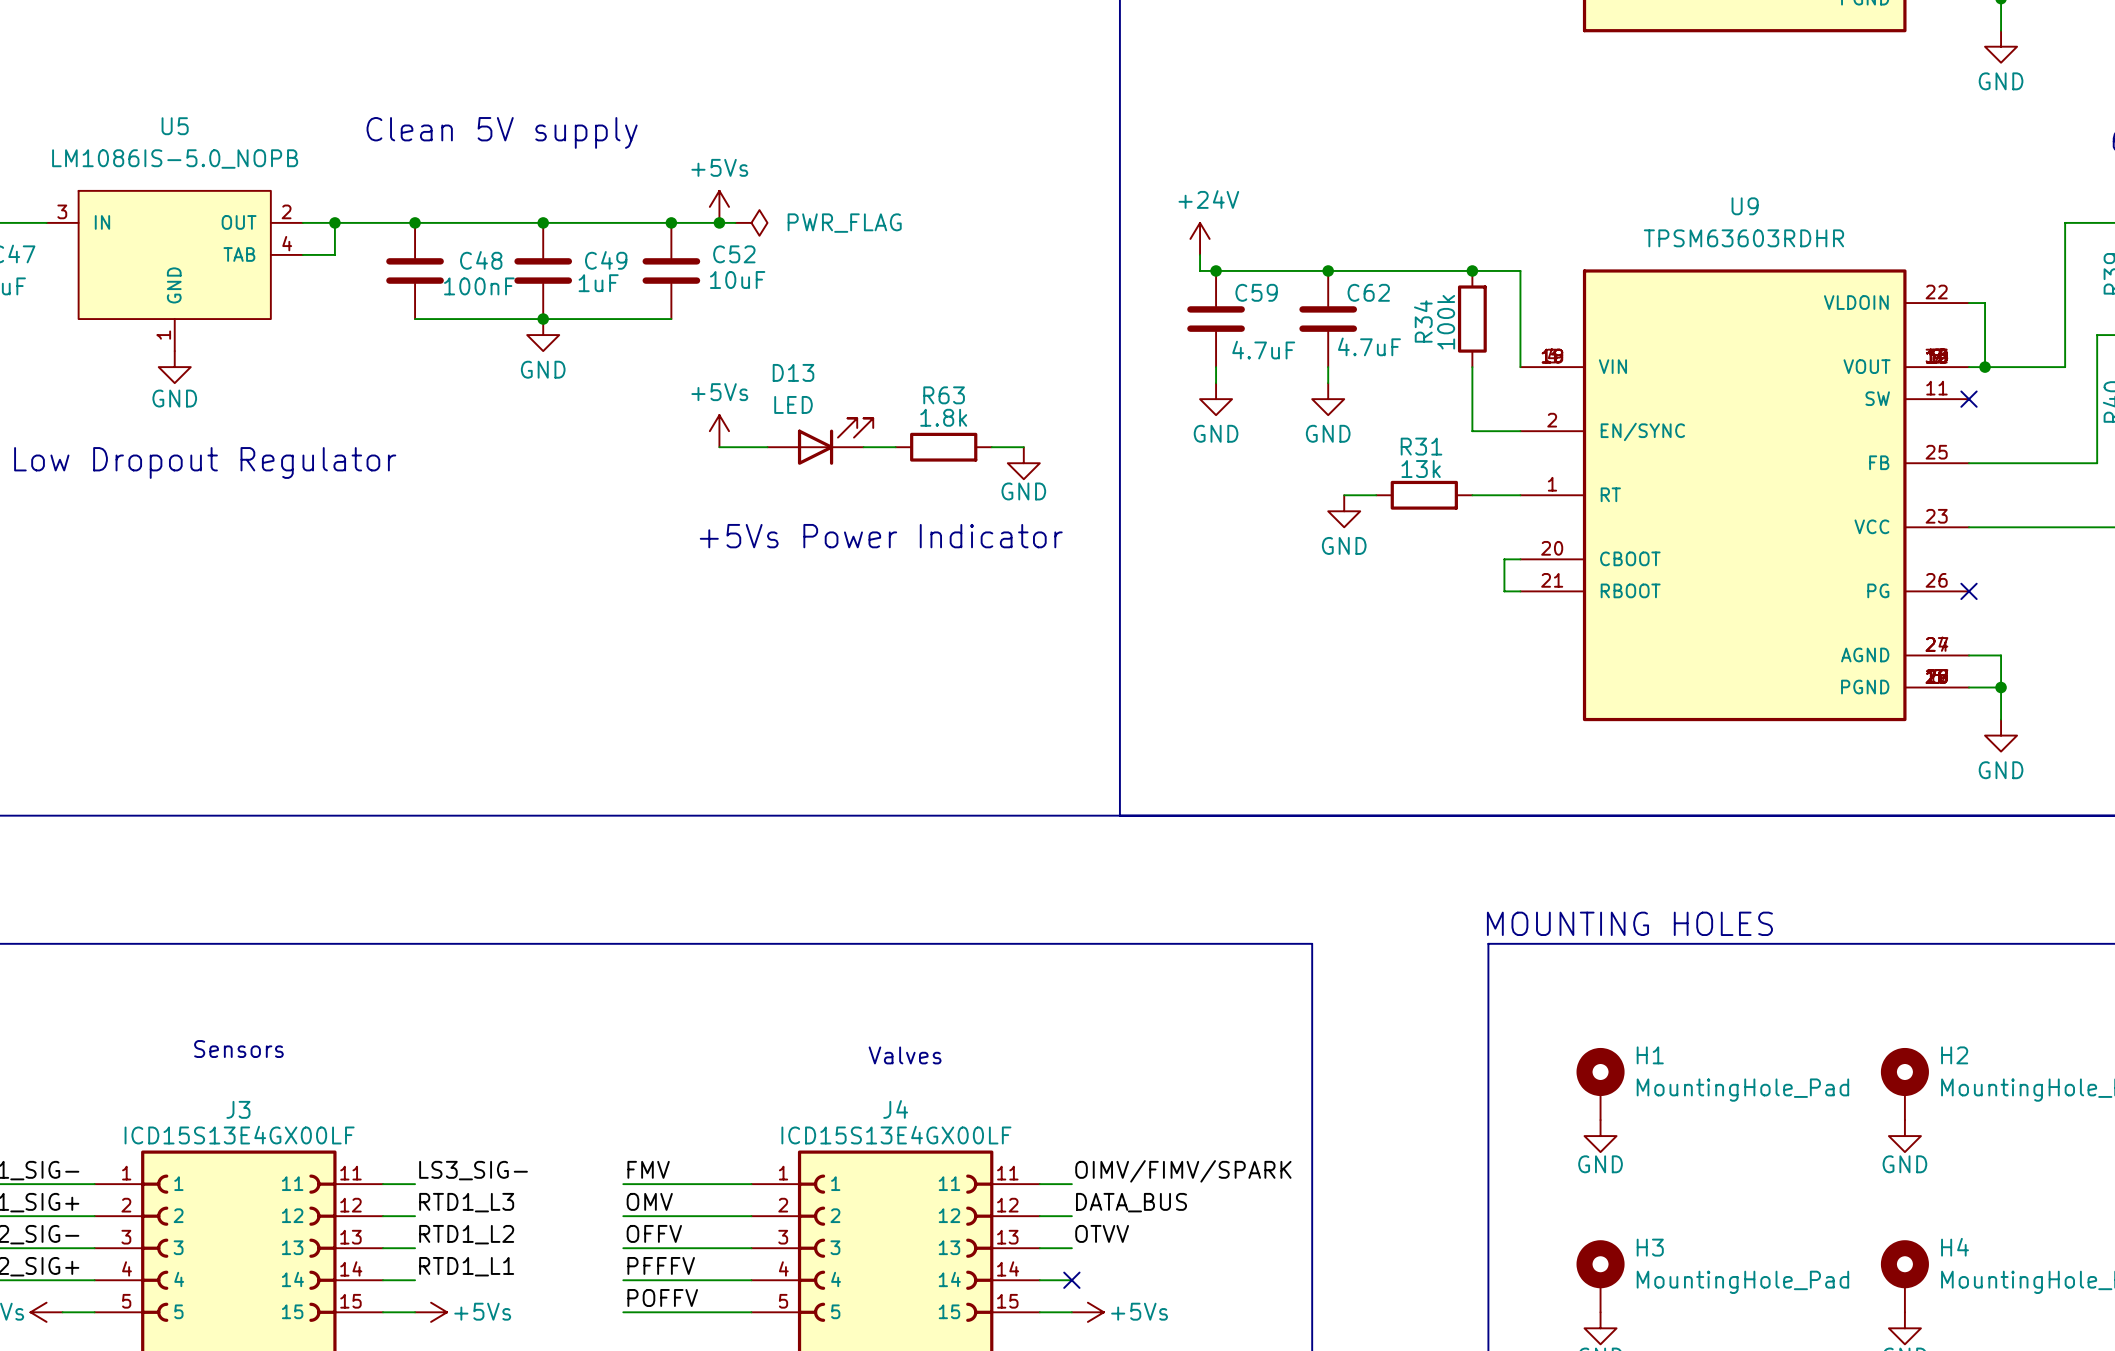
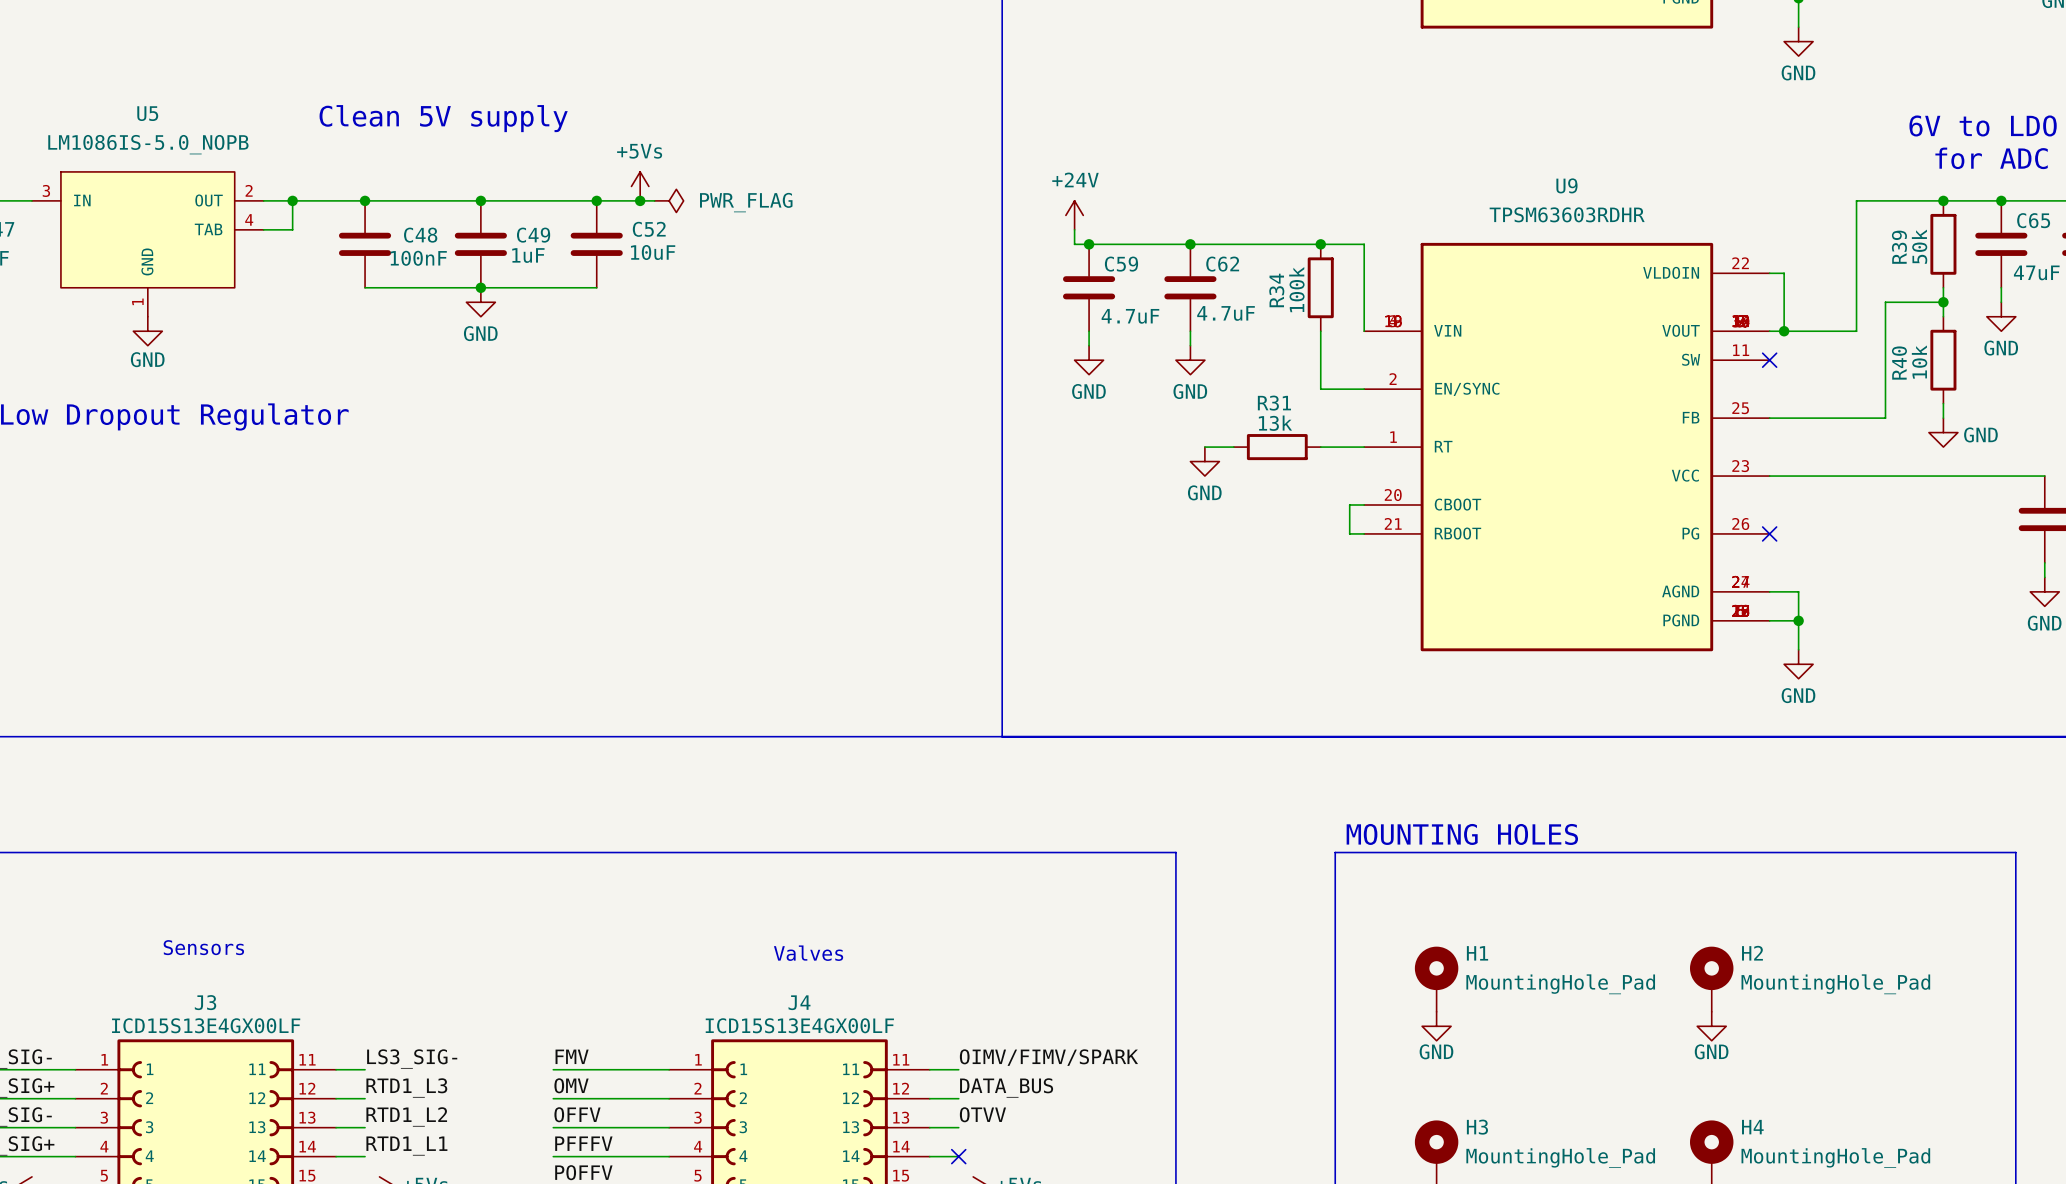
power symbol: +5Vs (719, 431) -> none
D13: LED (820, 441) -> none
wire: (719, 447) (767, 447) -> none
wire: (863, 447) (895, 447) -> none
R63: 1.8k (943, 447) -> none
wire: (991, 447) (1023, 447) -> none
power symbol: GND (1023, 463) -> none
text: +5Vs Power Indicator (881, 536) -> none

